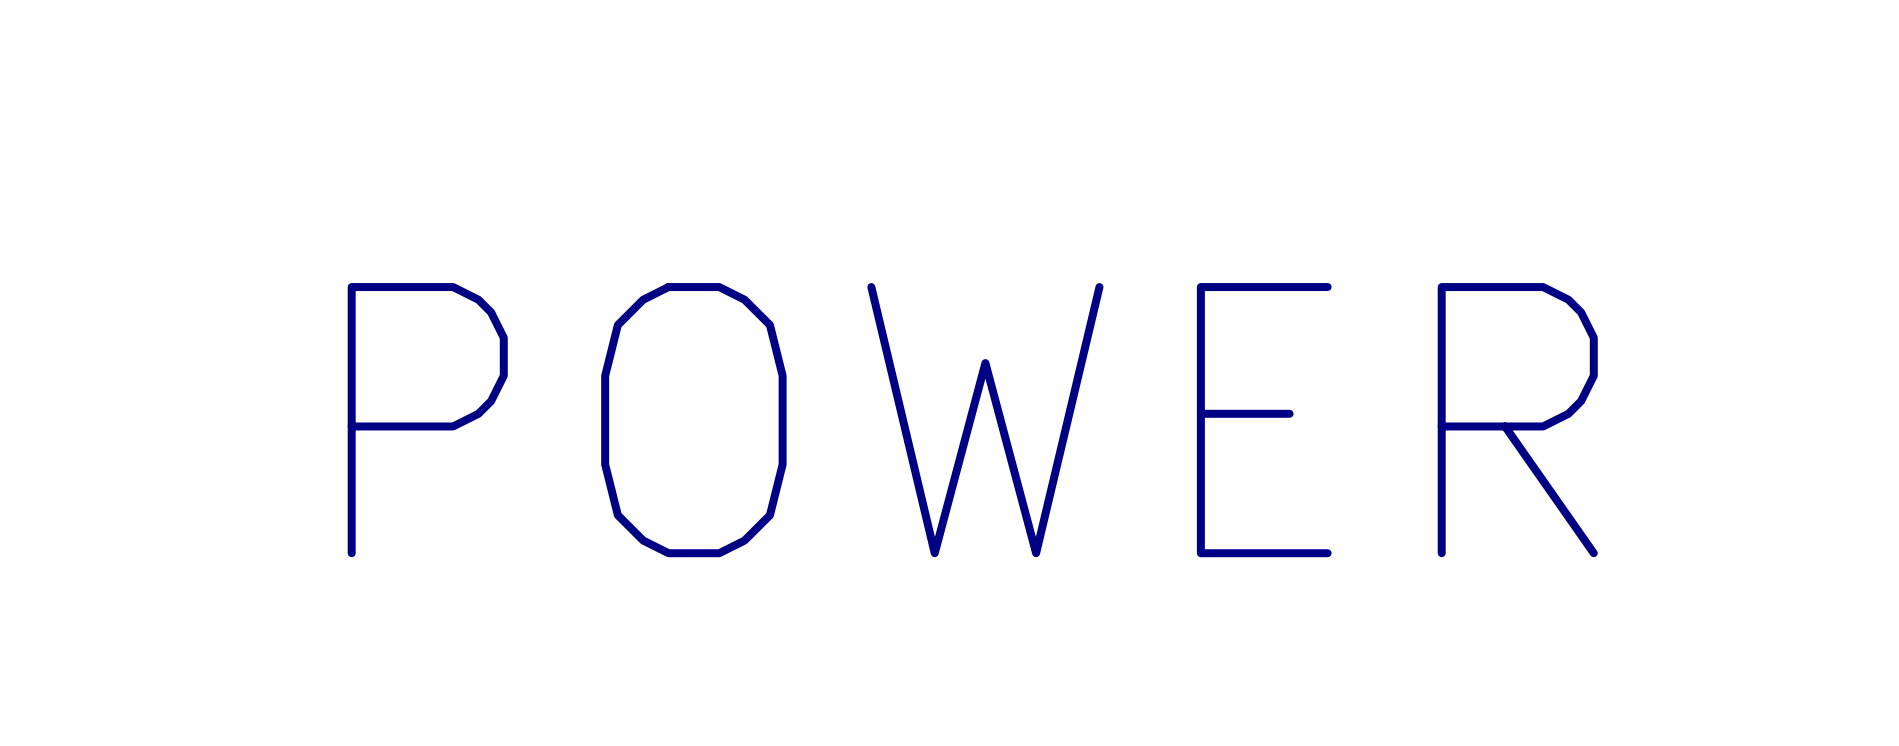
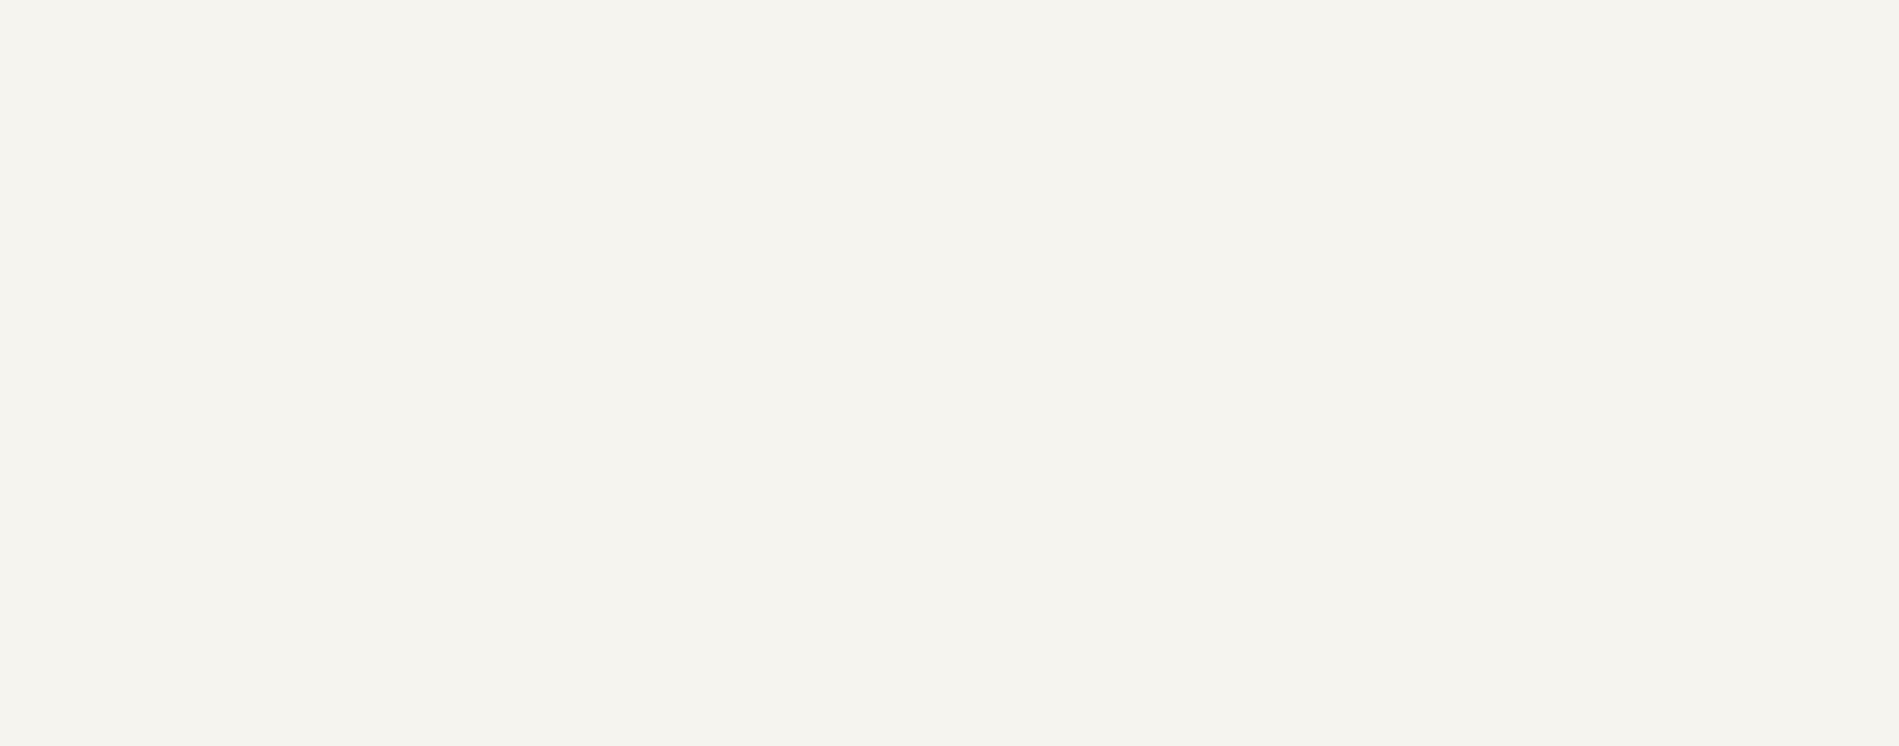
text: POWER (972, 420) -> none

